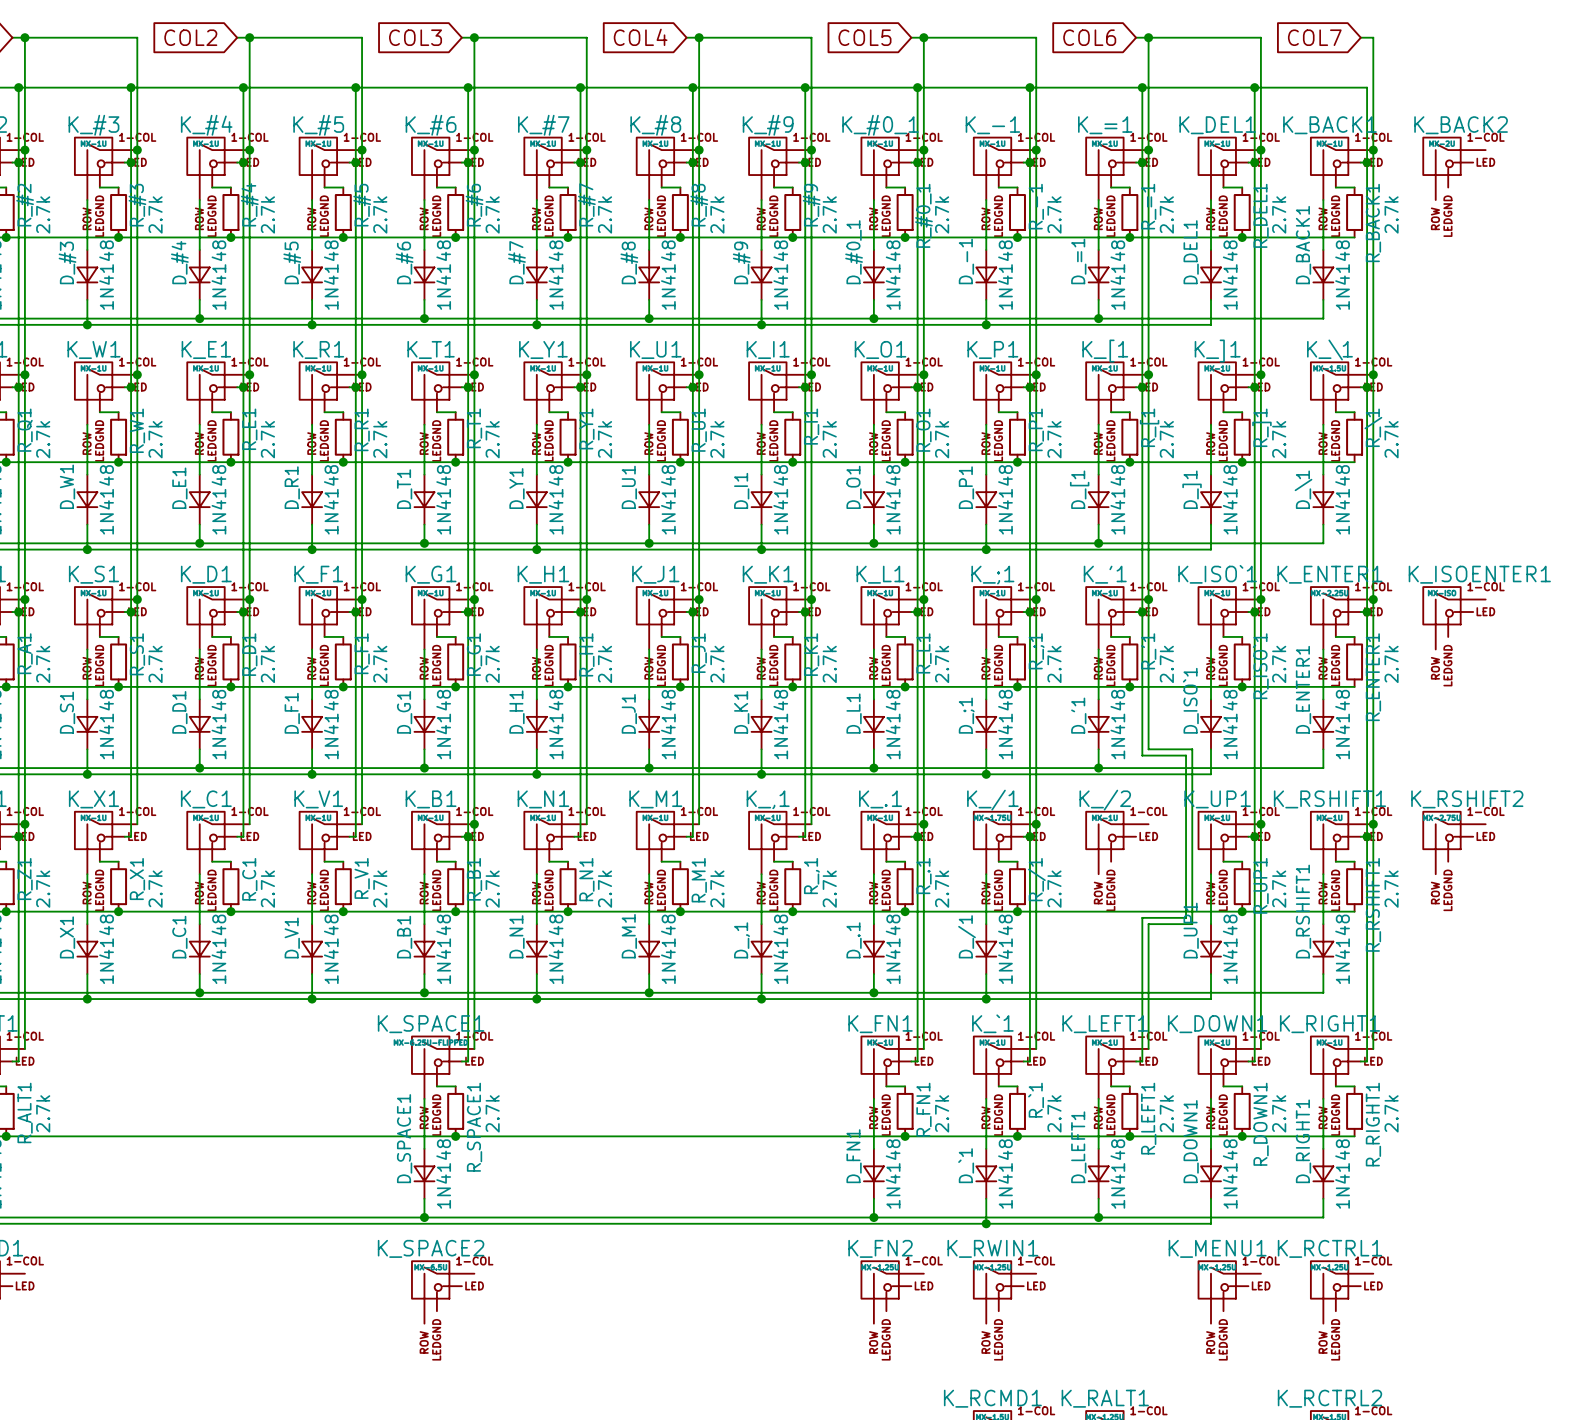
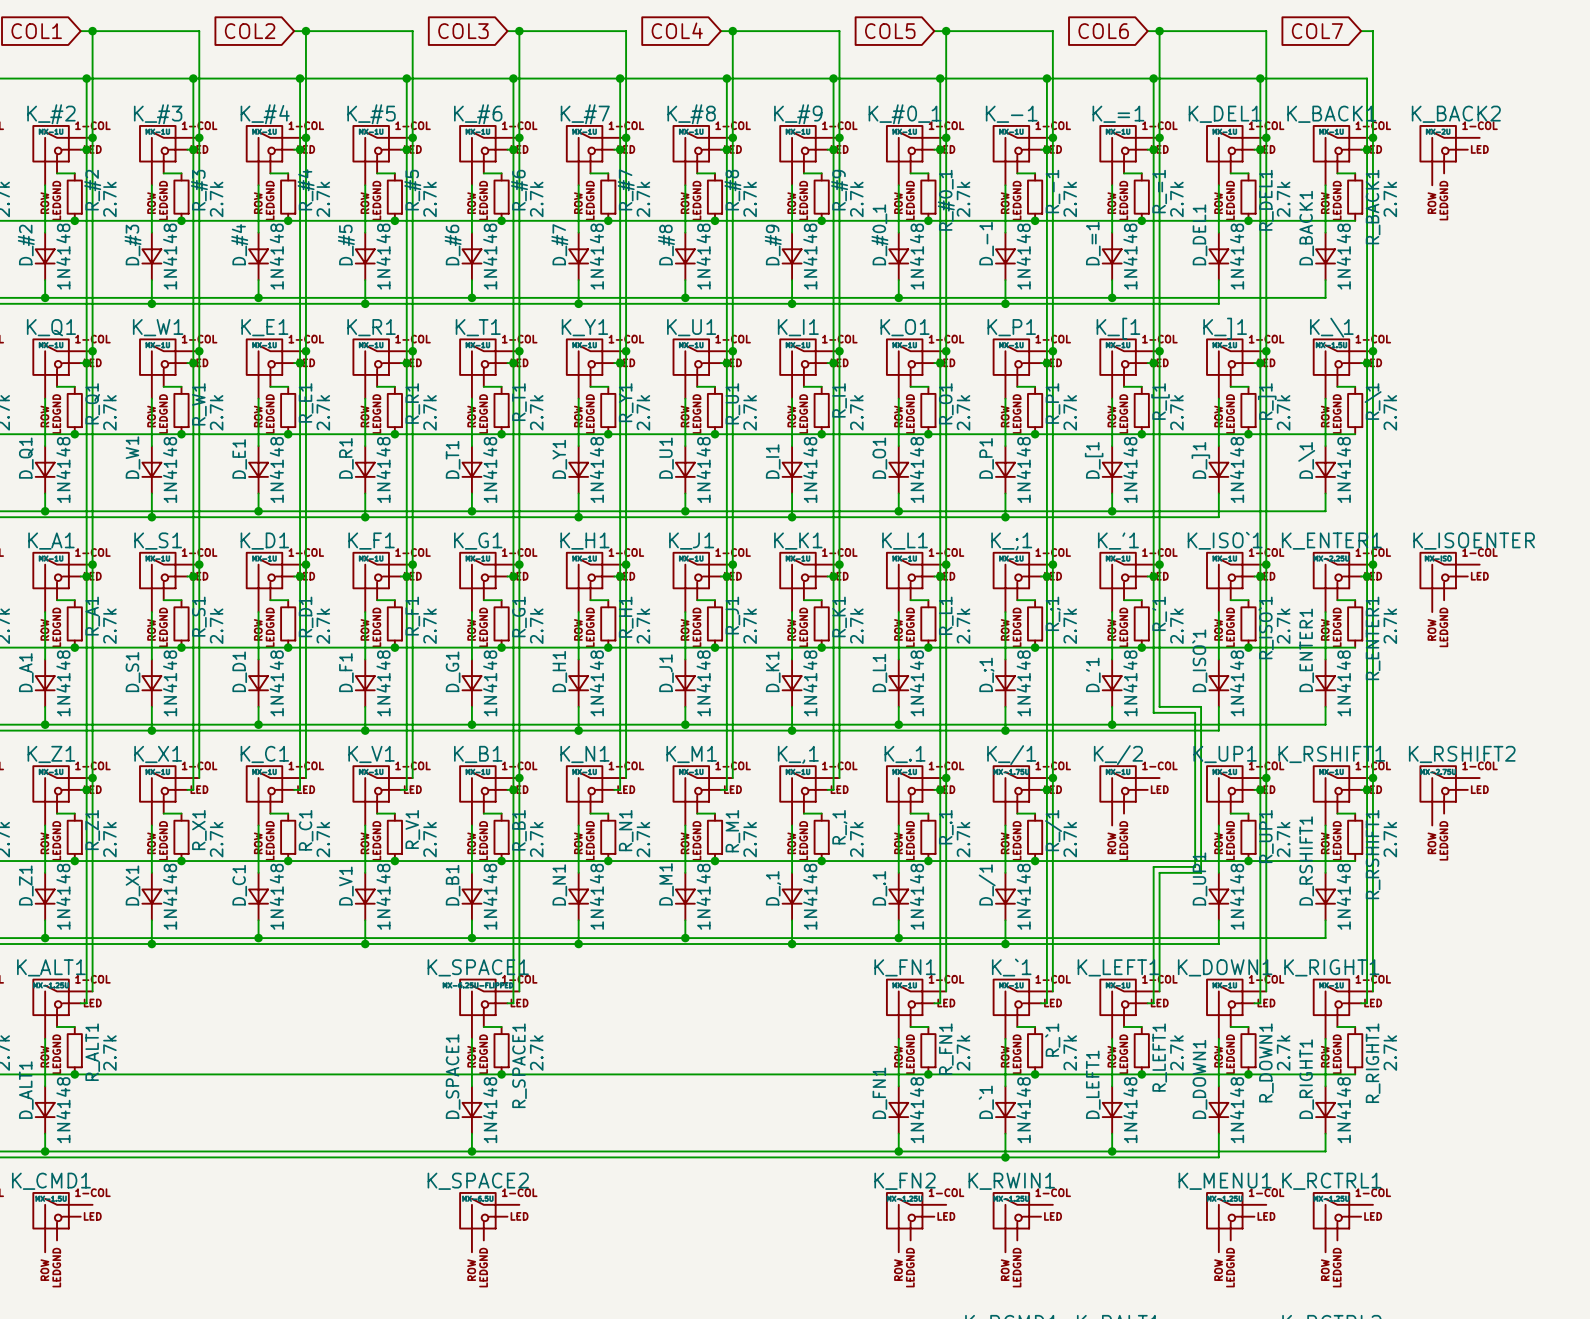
K_ISOENTER1 name: K_ISOENTER1 (1479, 574) -> K_ISOENTER (1474, 541)

